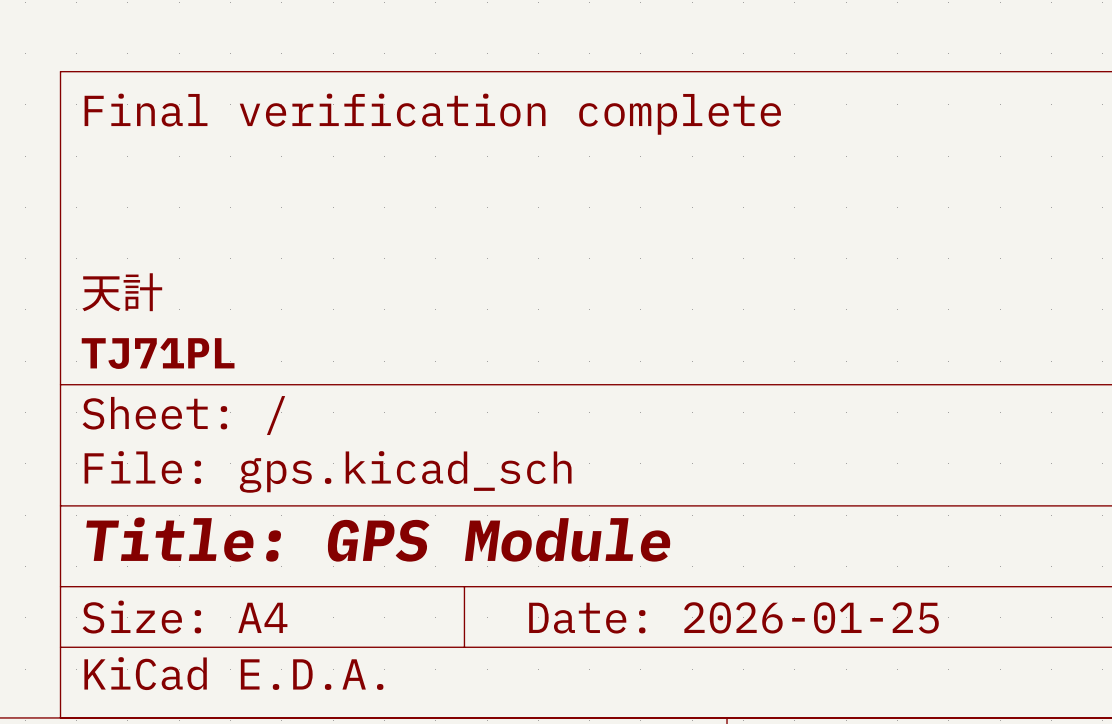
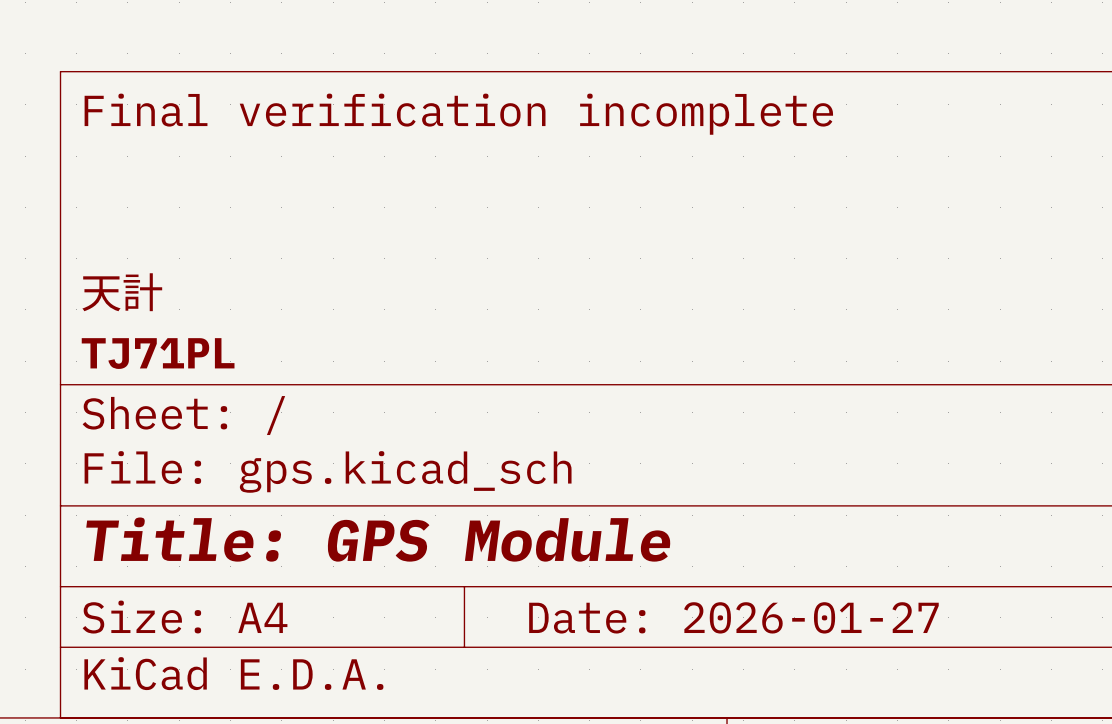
title block: Final verification complete (432, 114) -> Final verification incomplete (458, 114)
title block: Date: 2026-01-25 (733, 617) -> Date: 2026-01-27 (733, 617)

